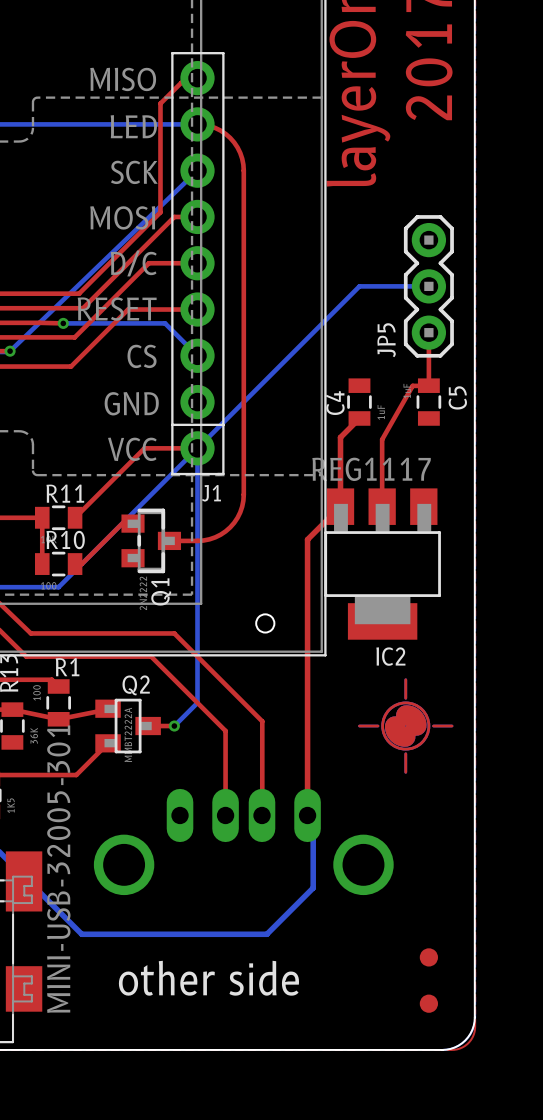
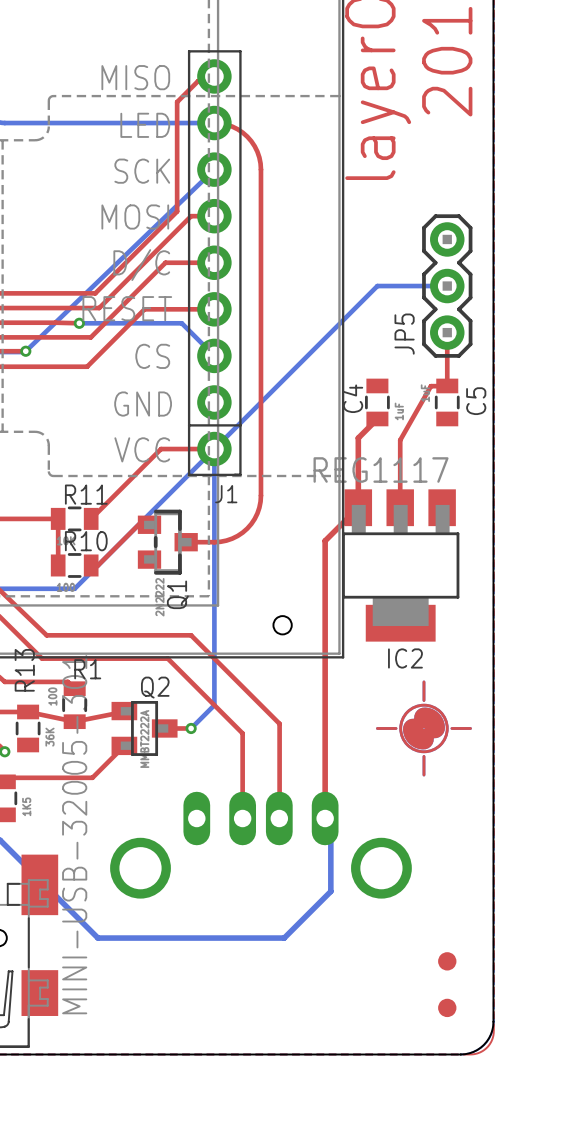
text: other side (208, 978) -> none

